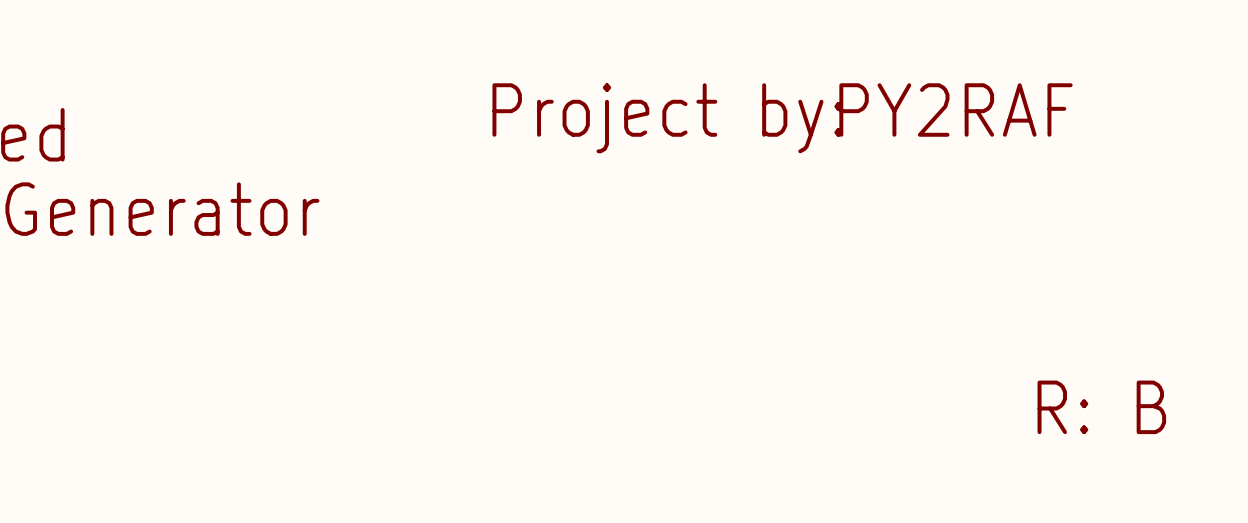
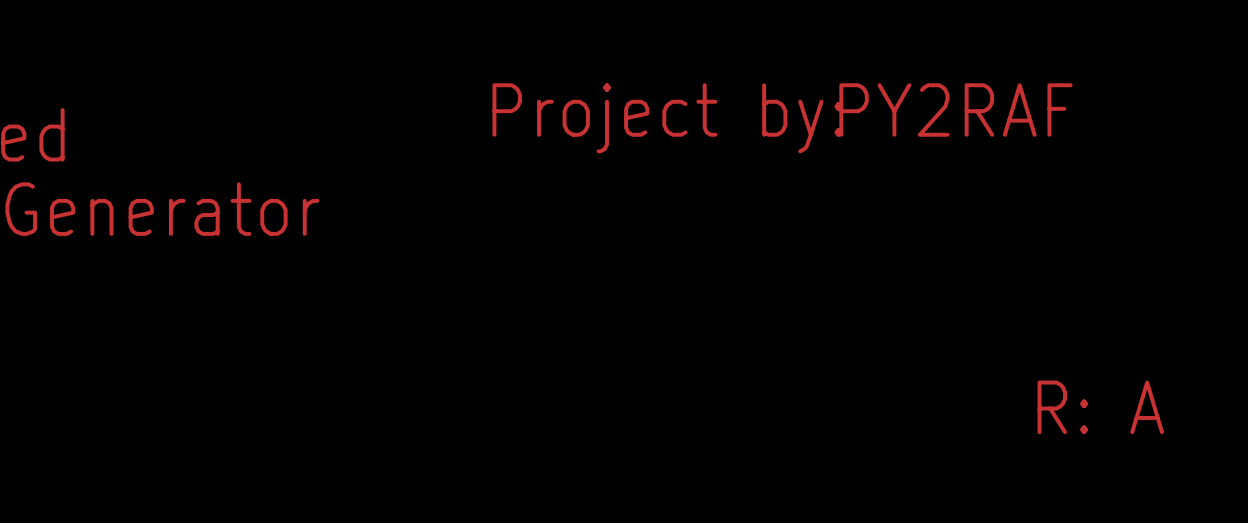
text: B (1151, 407) -> A (1147, 407)

